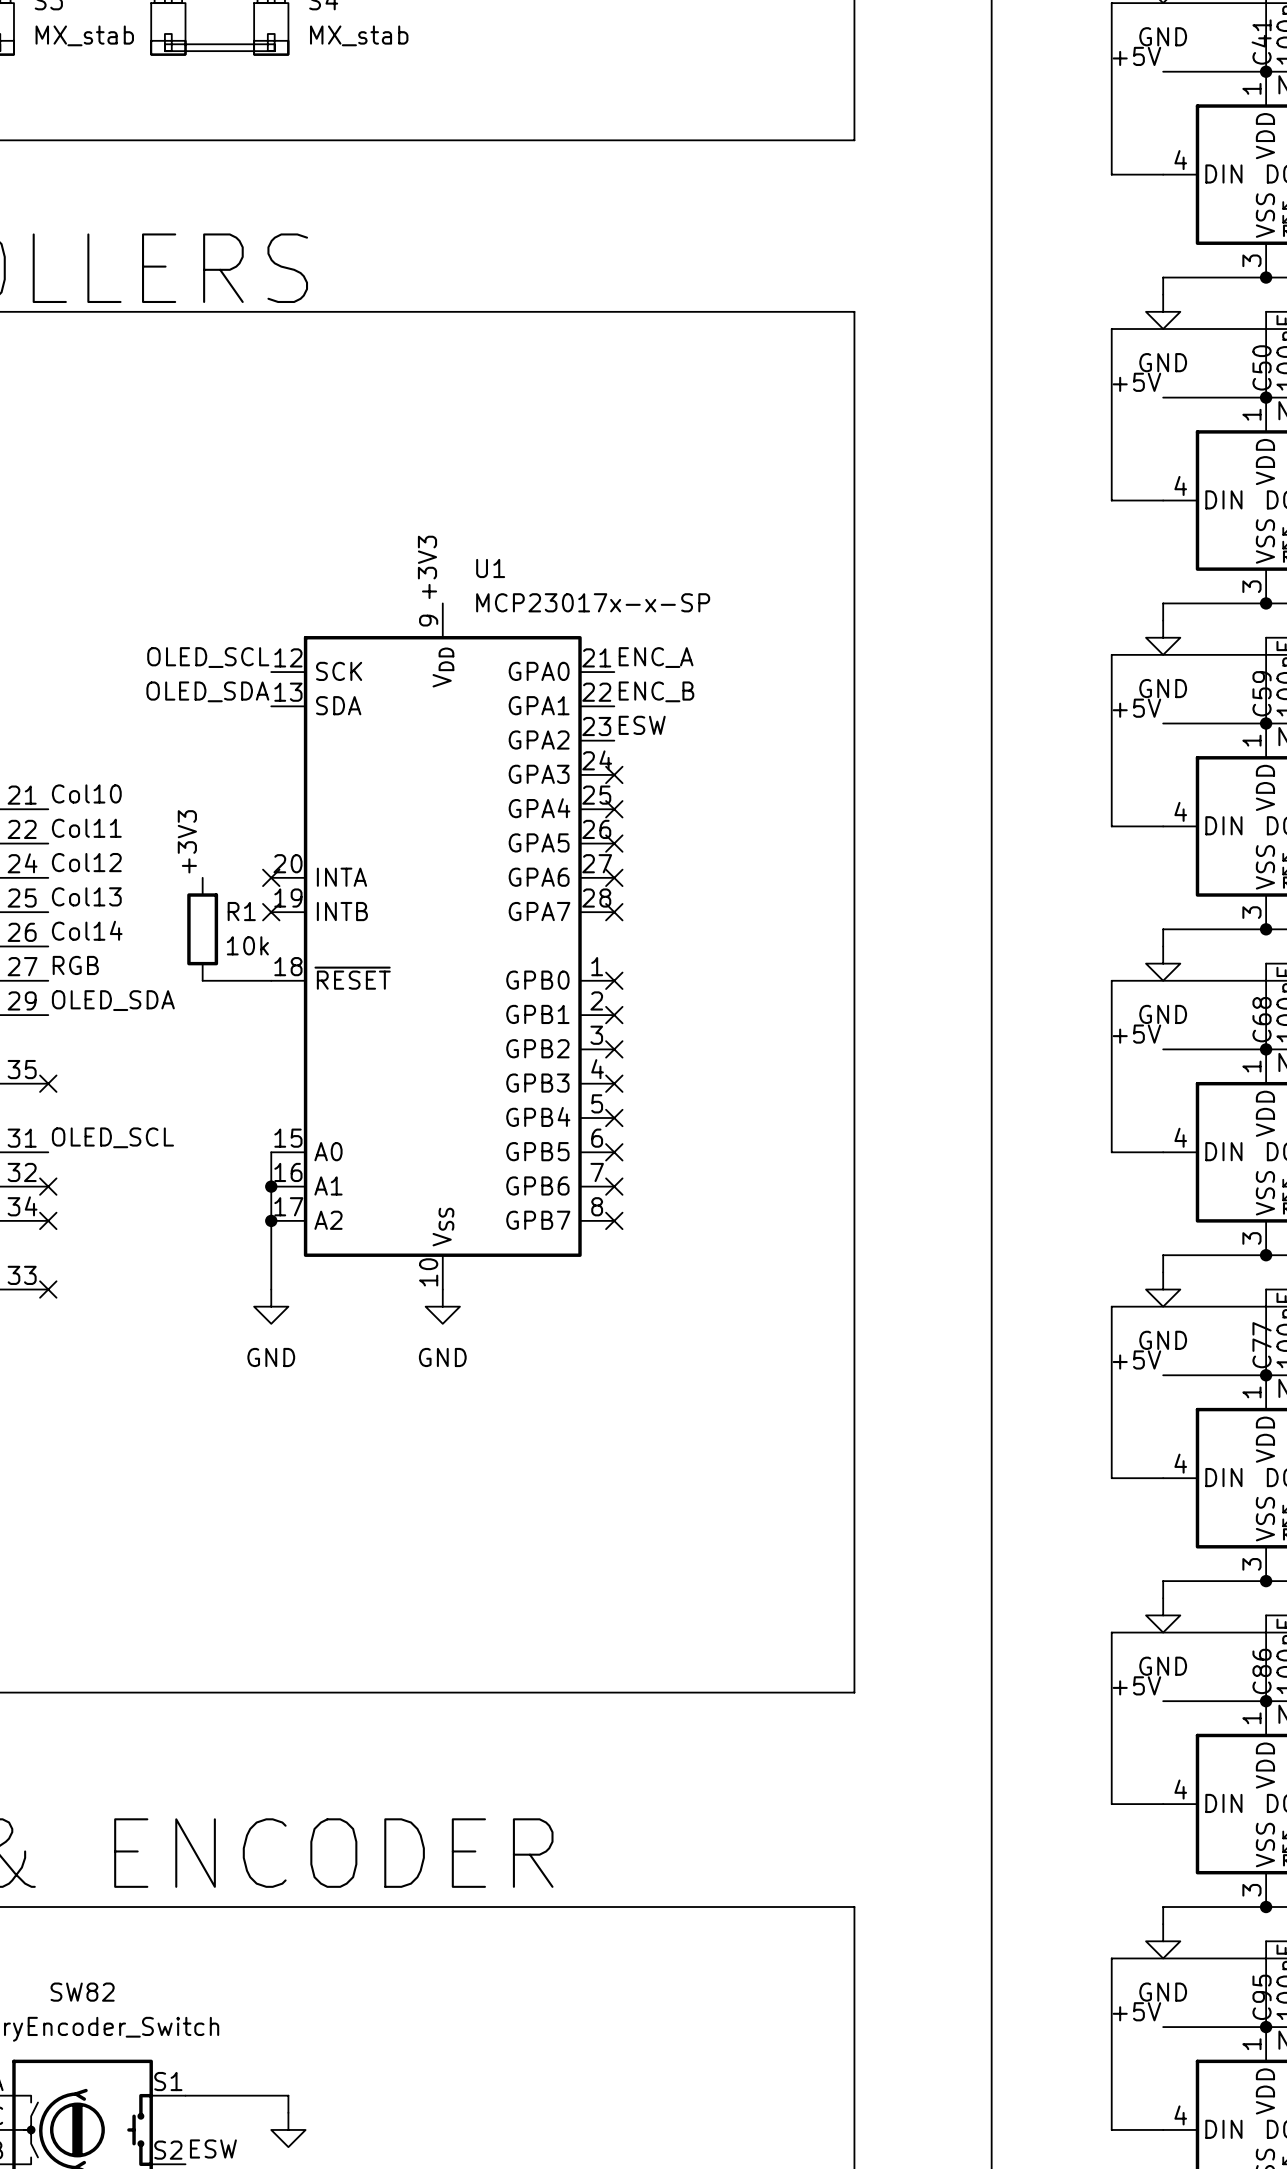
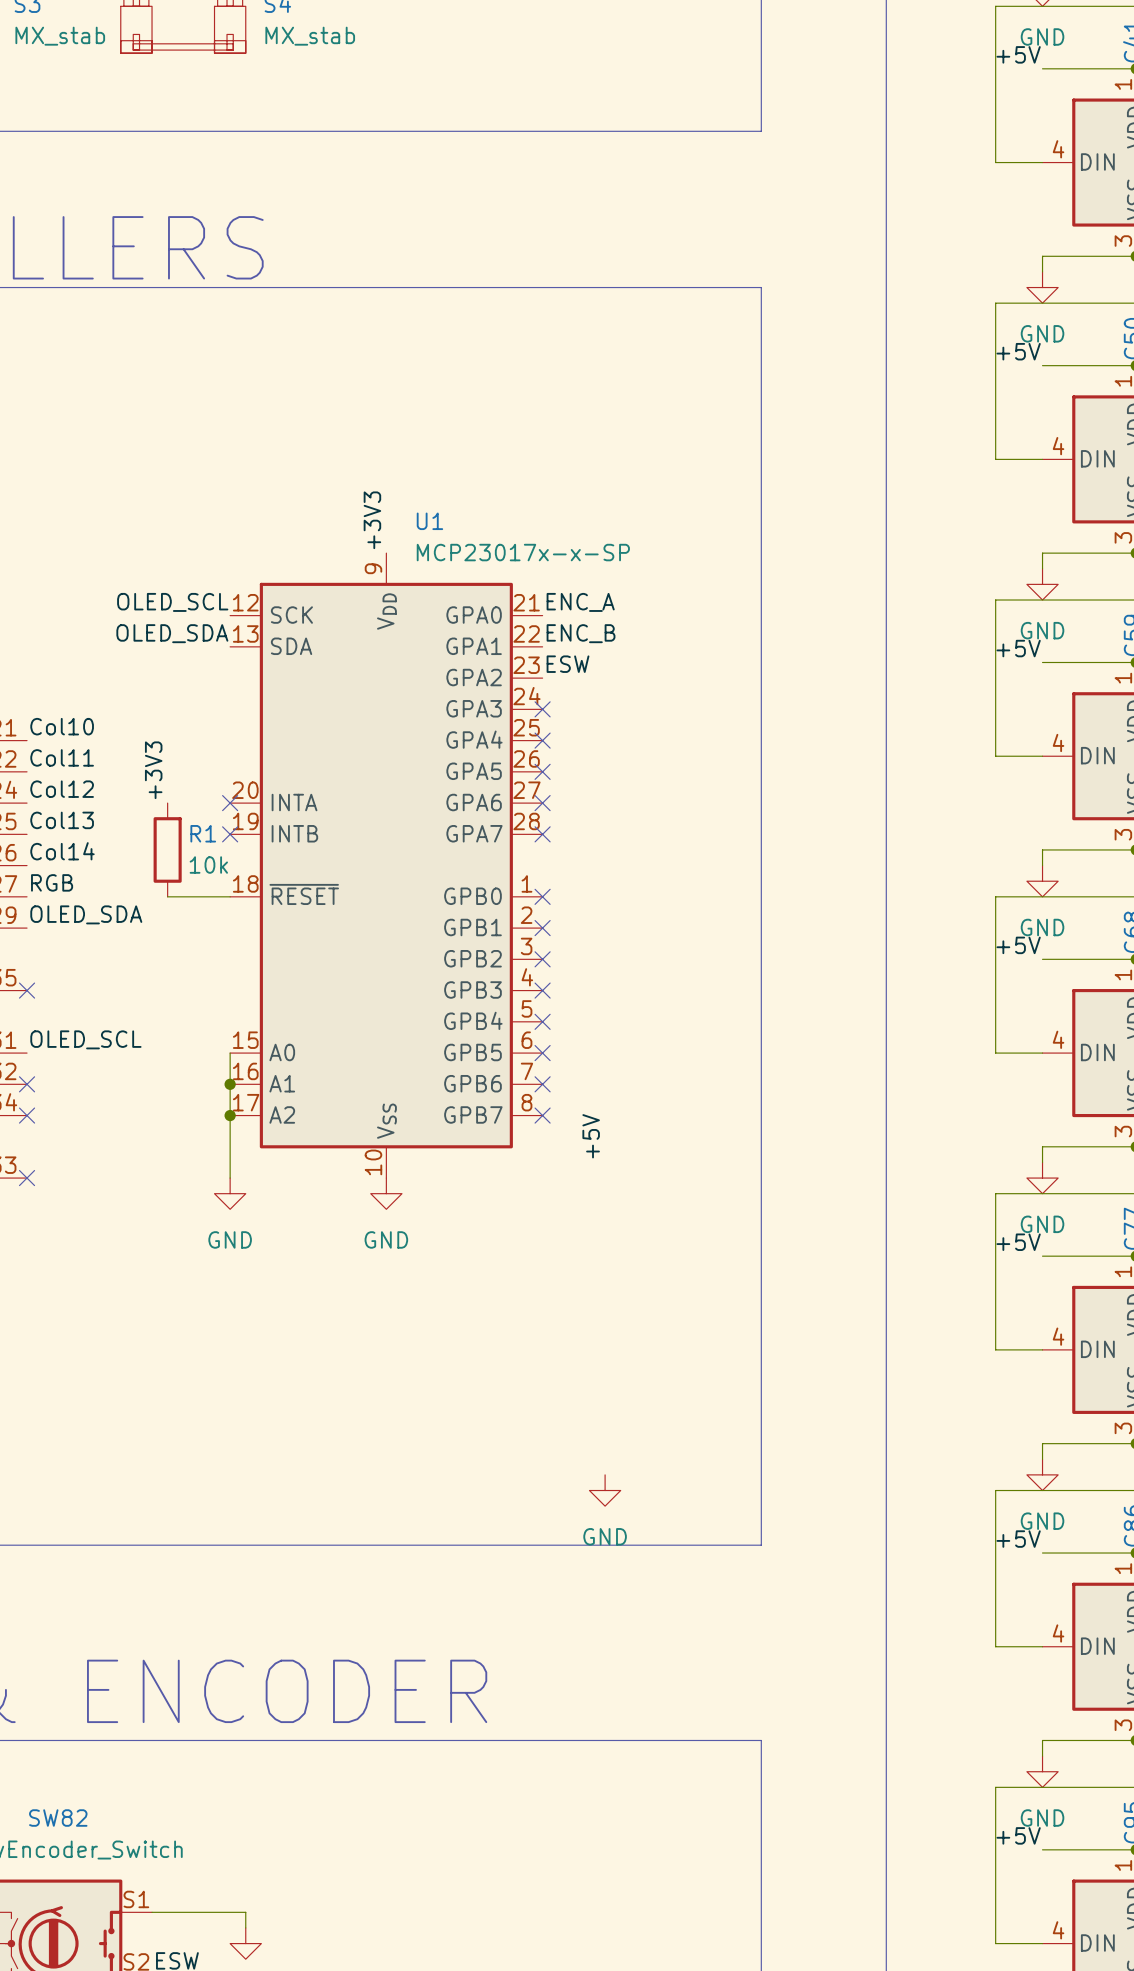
label: none -> +5V (591, 1136)
power symbol: none -> GND (605, 1490)

